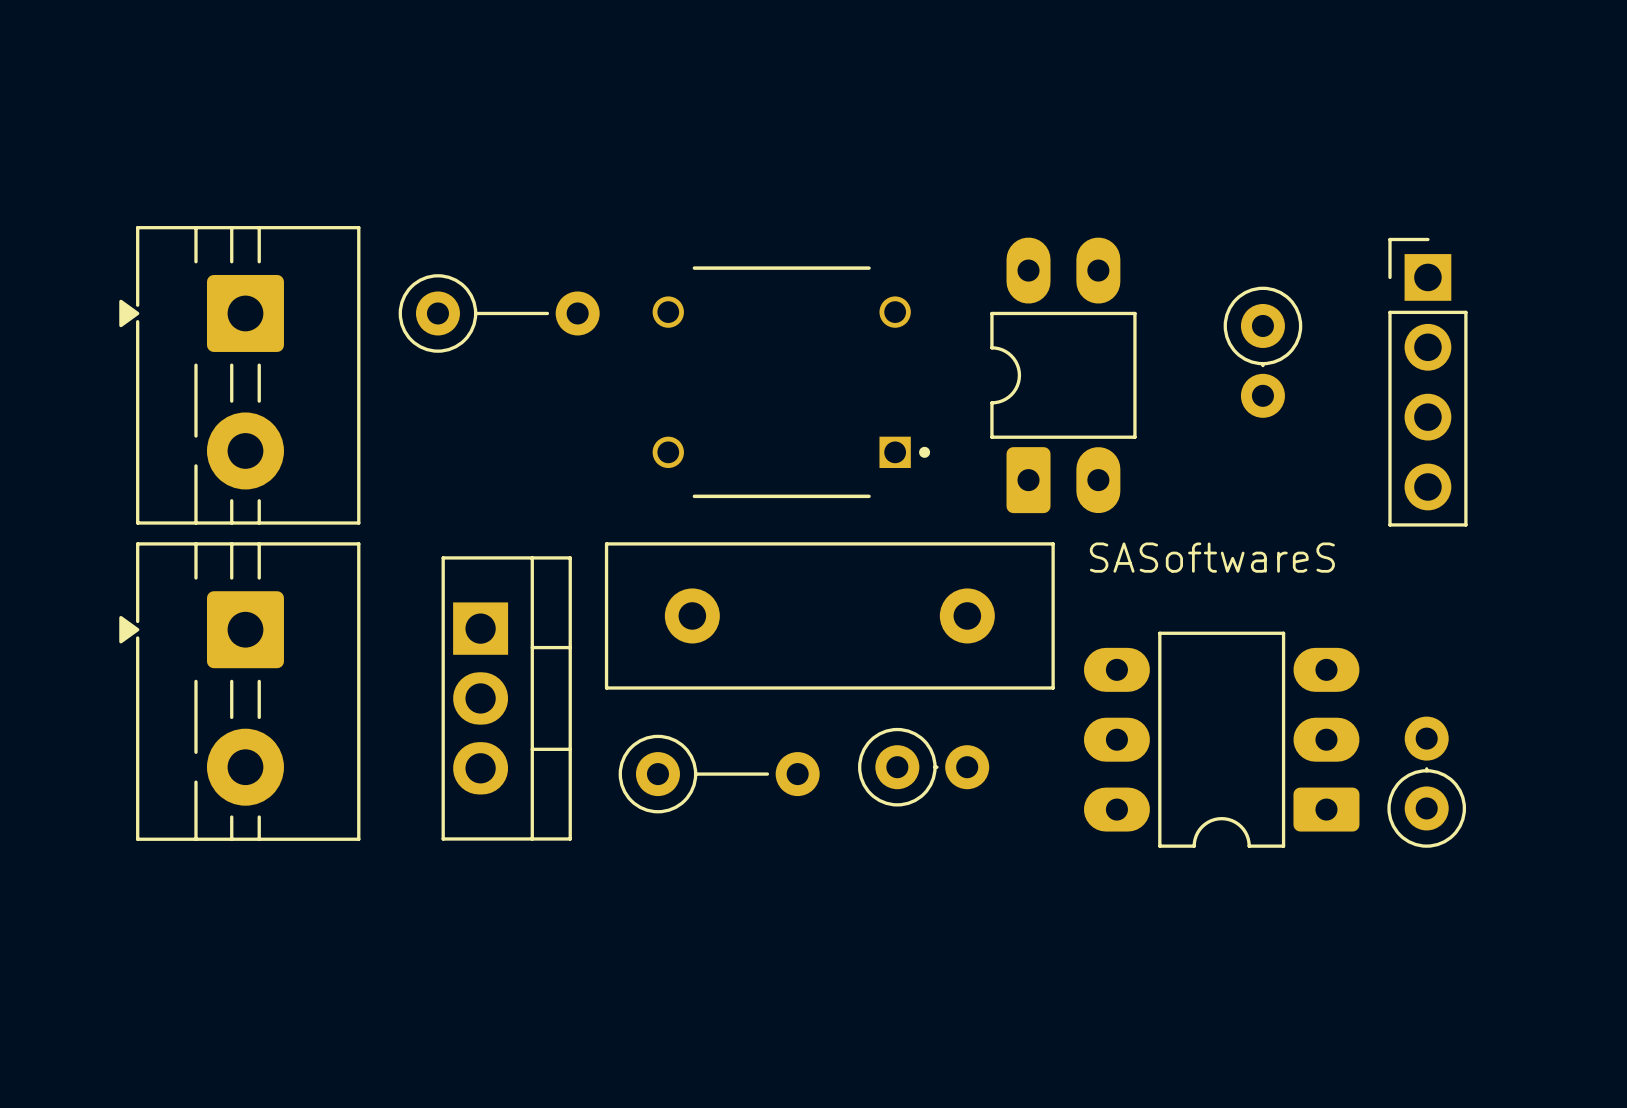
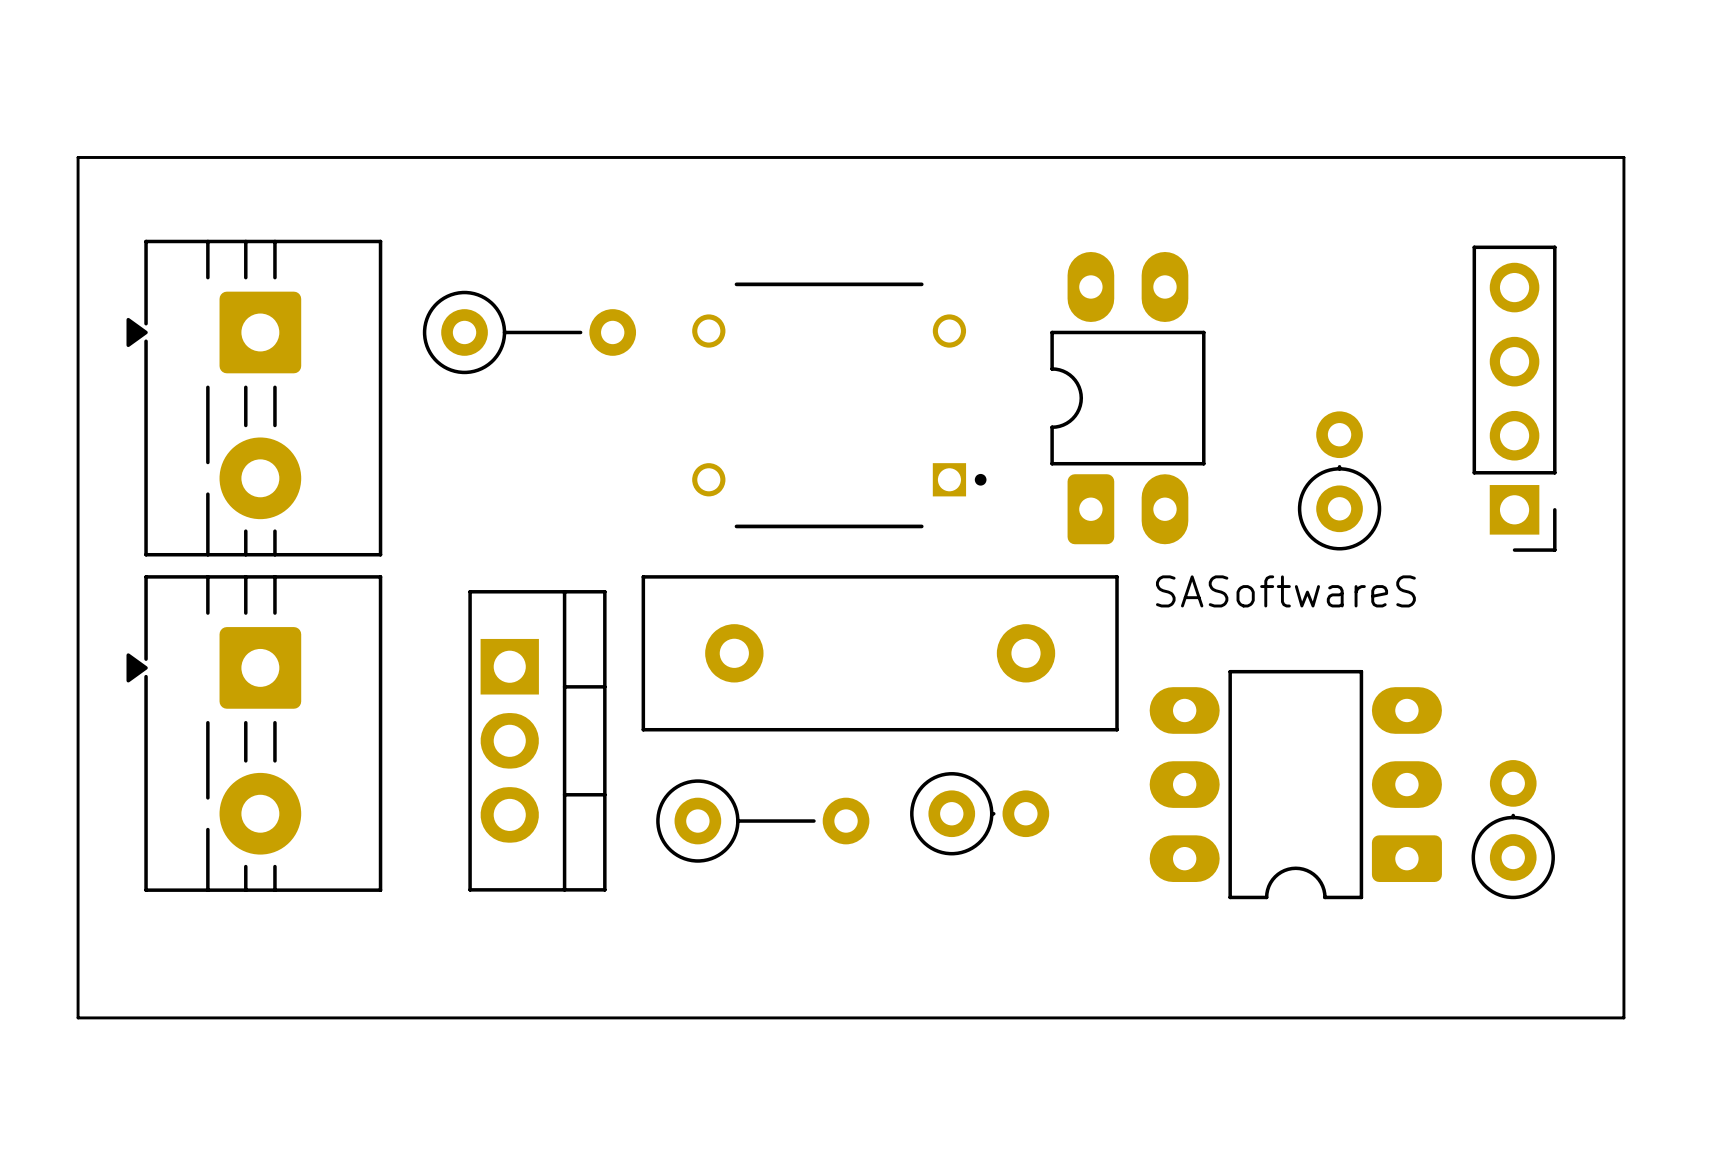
line: none -> (78, 157) (1623, 157) (1623, 1017) (78, 1017) (78, 157)
part rotation: 0° (1262, 352) -> 180° (1339, 480)
part position: (1262, 352) -> (1339, 480)
part rotation: 0° (1427, 382) -> 180° (1514, 398)

